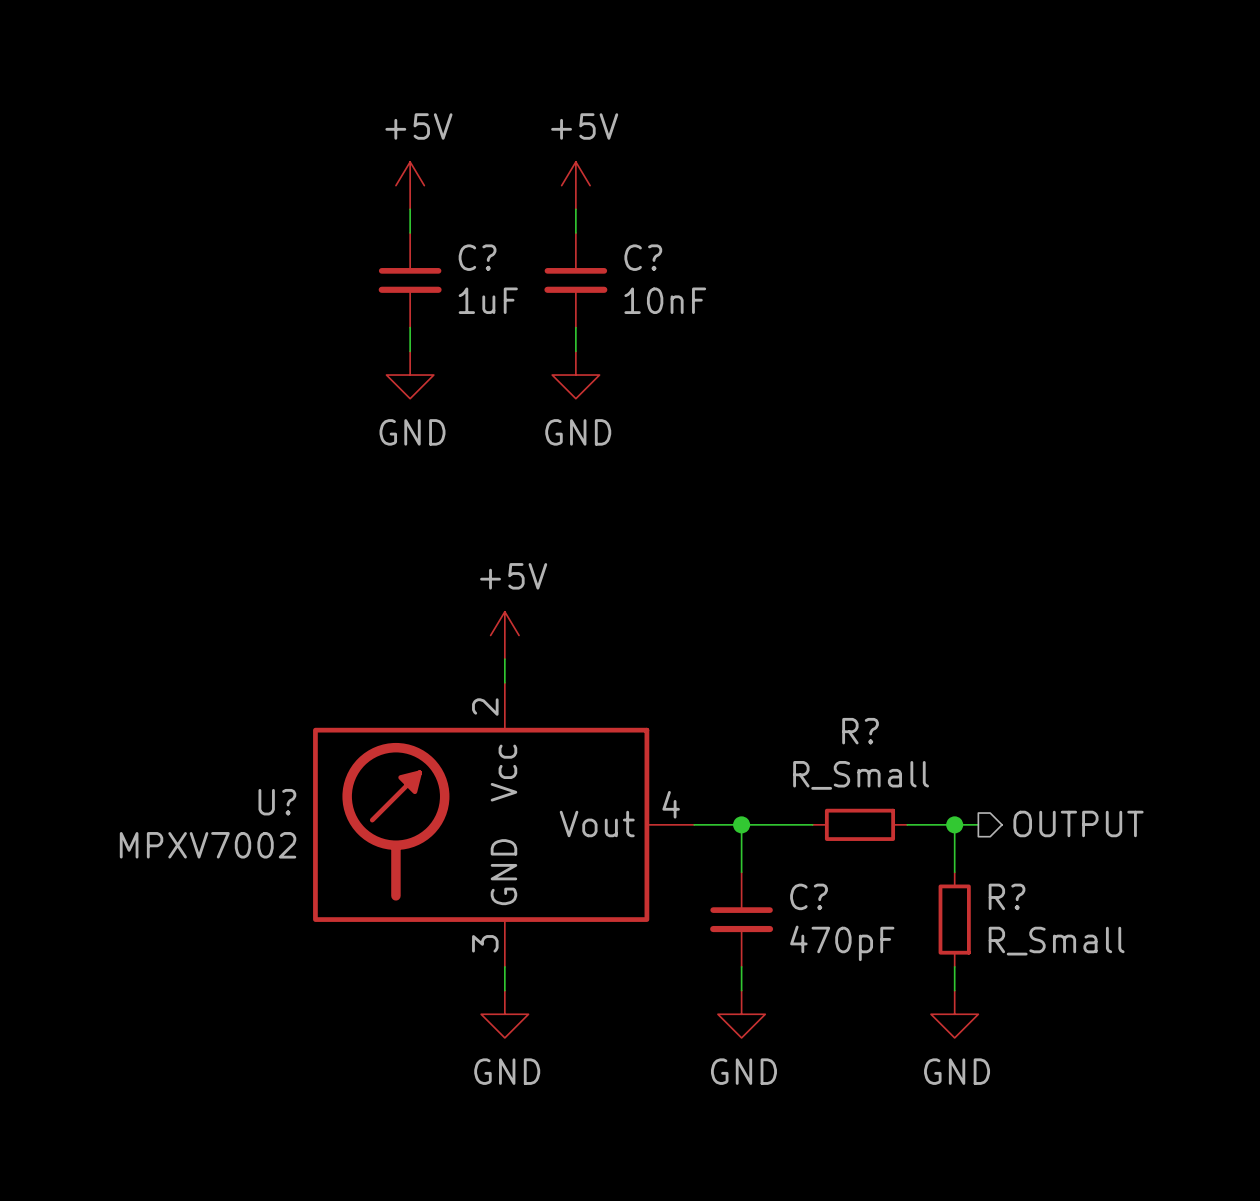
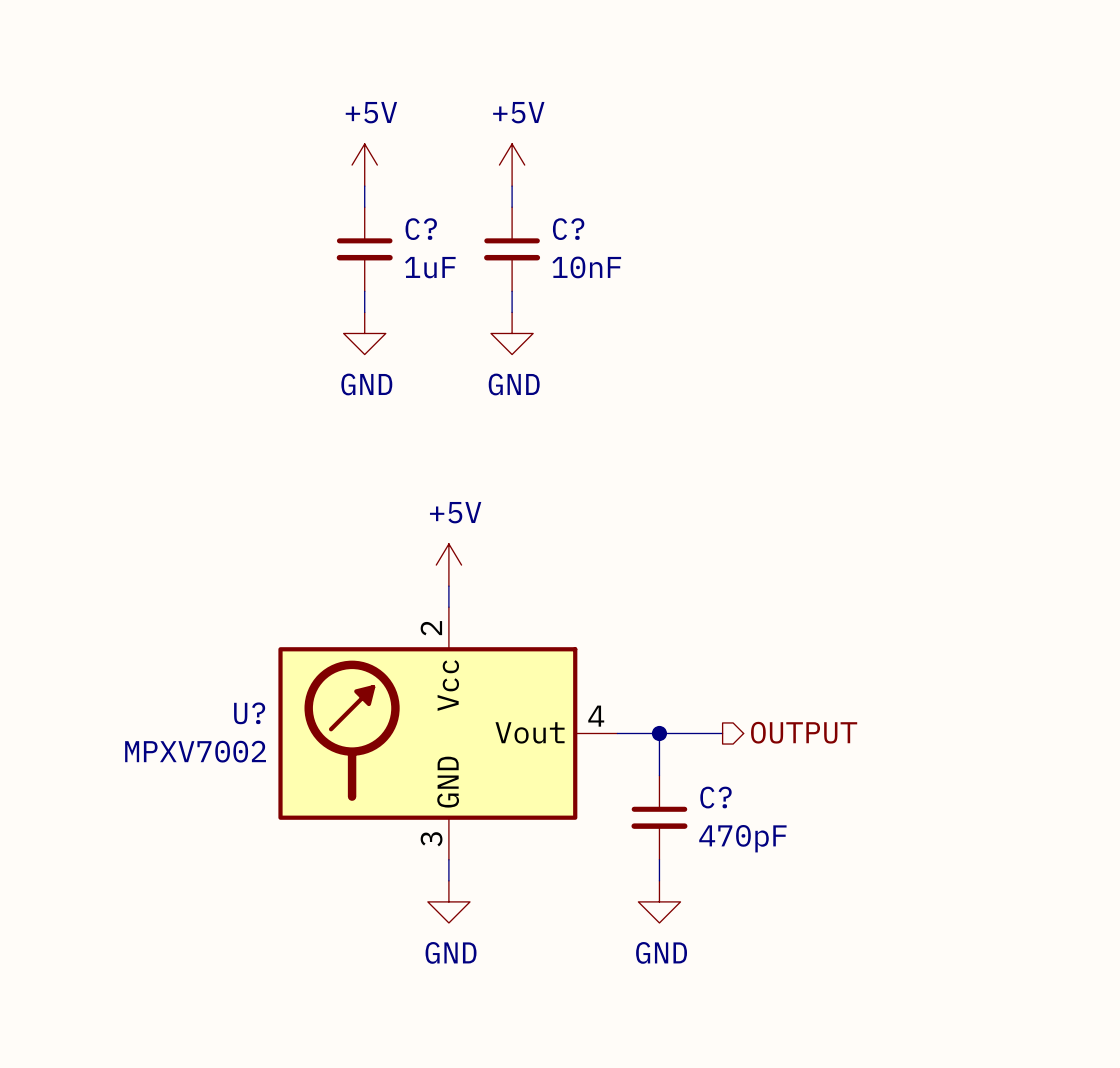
hierarchical label position: OUTPUT (1078, 823) -> OUTPUT (804, 732)
R?: R_Small (859, 824) -> none
wire: (907, 824) (978, 824) -> none
wire: (954, 824) (954, 872) -> none
junction: (954, 824) -> none
R?: R_Small (954, 919) -> none
wire: (954, 966) (954, 990) -> none
power symbol: GND (954, 1014) -> none

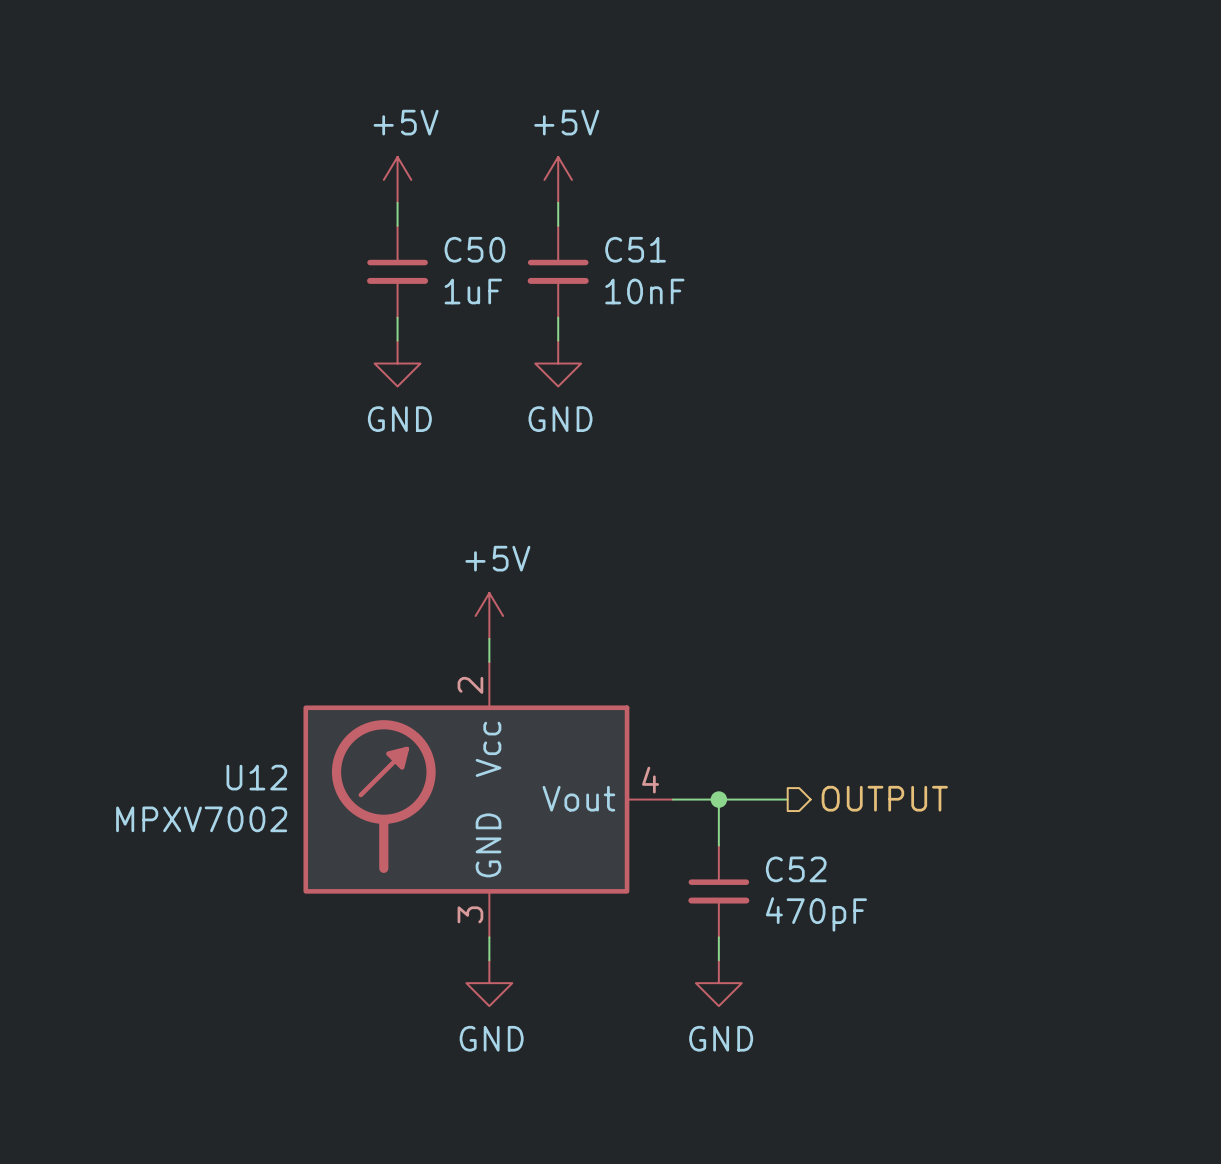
C? name: C? (421, 229) -> C50 (474, 249)
C? name: C? (568, 229) -> C51 (635, 249)
U? name: U? (249, 713) -> U12 (256, 777)
C? name: C? (715, 797) -> C52 (796, 869)

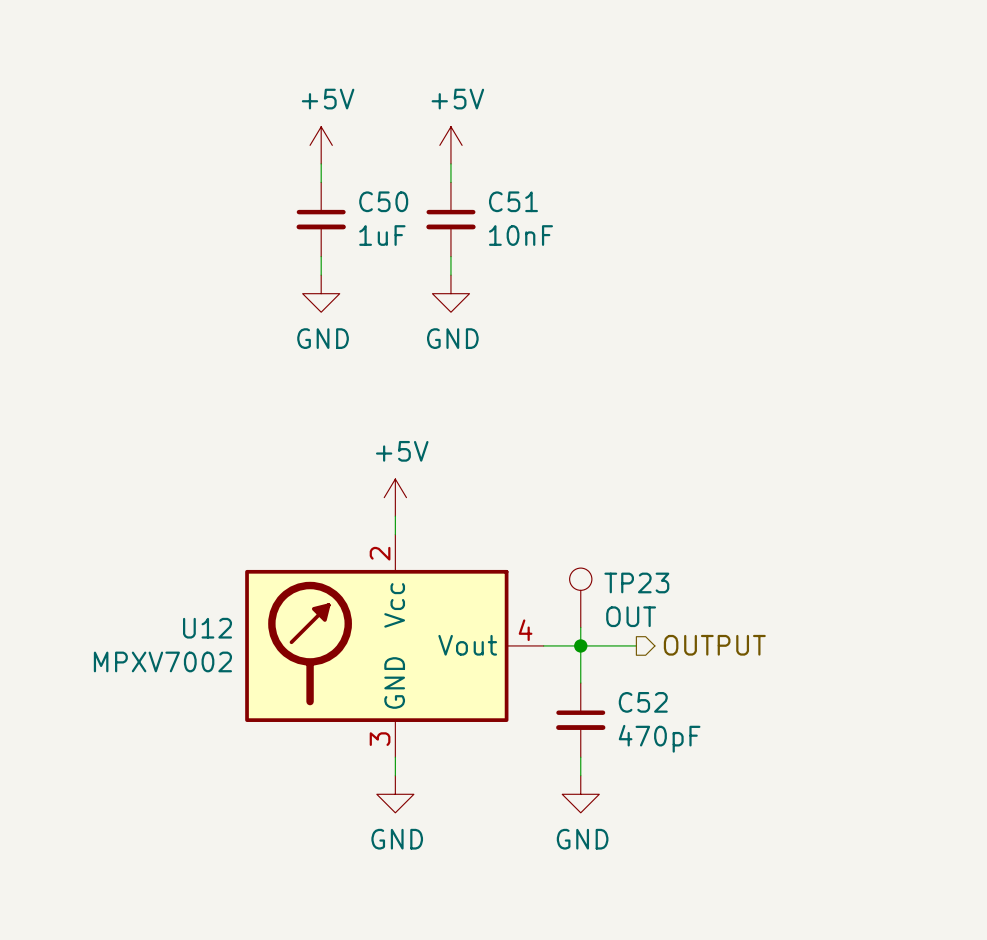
TP23: none -> OUT (580, 597)
wire: none -> (580, 627) (580, 645)

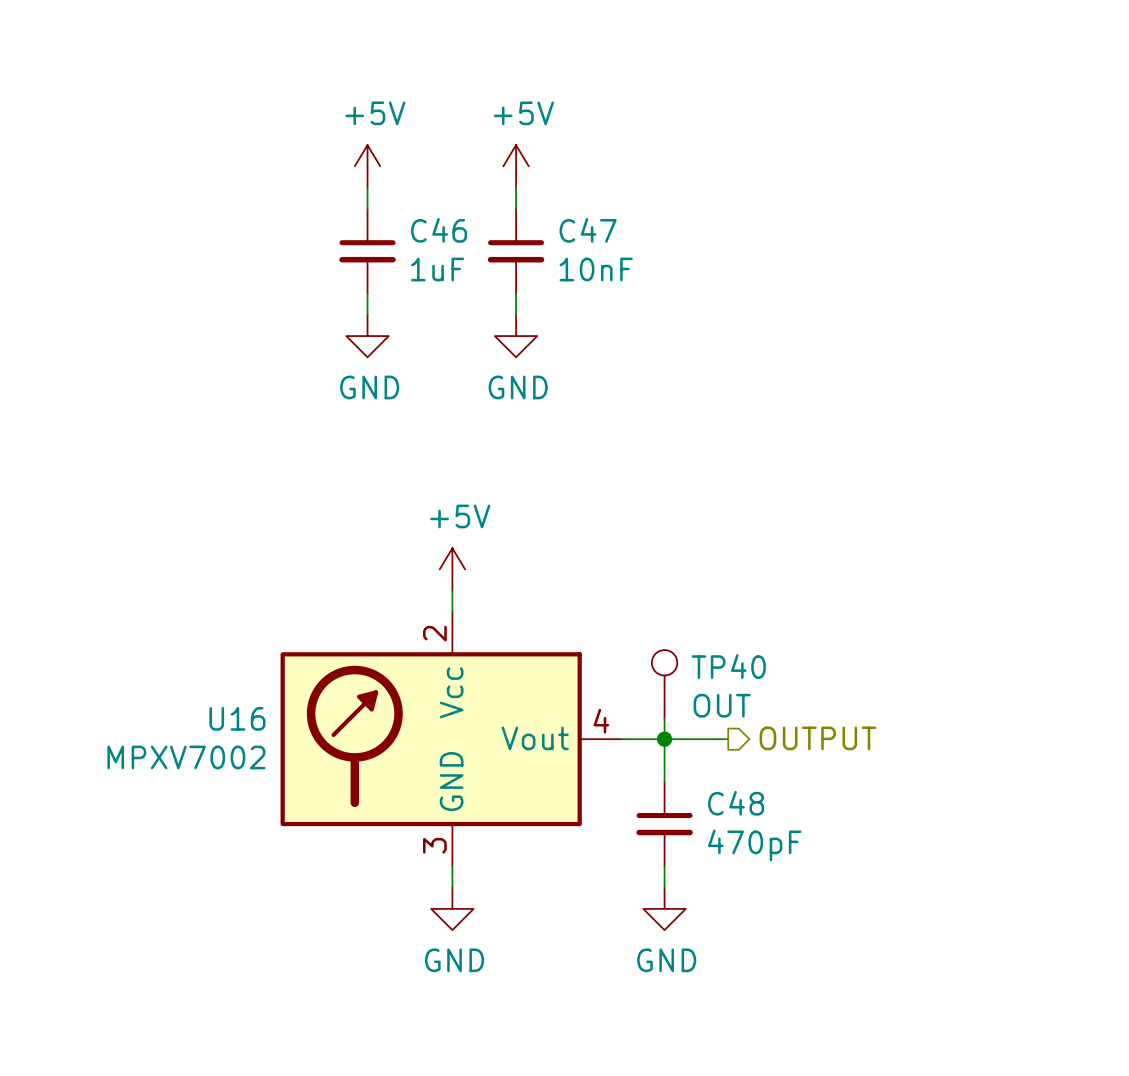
C50 name: C50 (383, 201) -> C46 (439, 230)
C51 name: C51 (513, 201) -> C47 (588, 230)
TP23 name: TP23 (636, 582) -> TP40 (728, 666)
U12 name: U12 (207, 628) -> U16 (237, 718)
C52 name: C52 (643, 702) -> C48 (736, 803)

